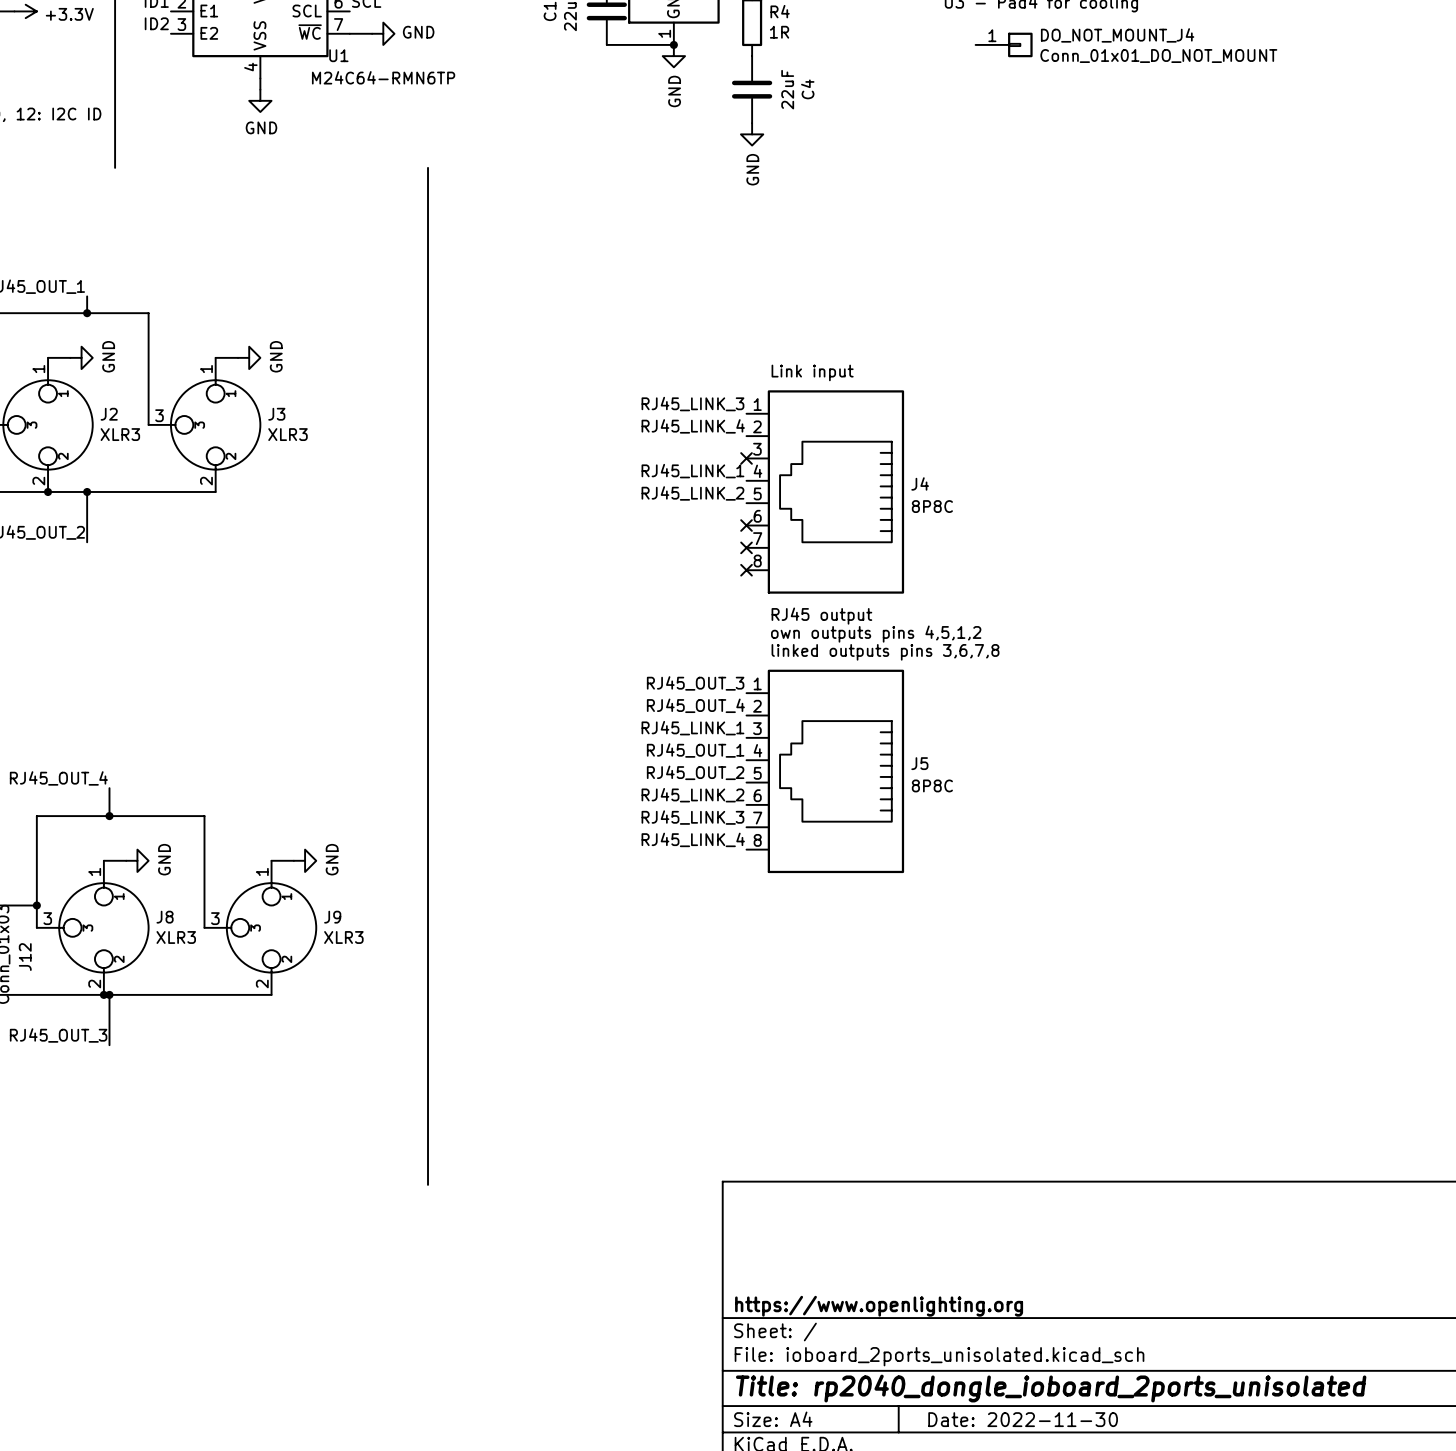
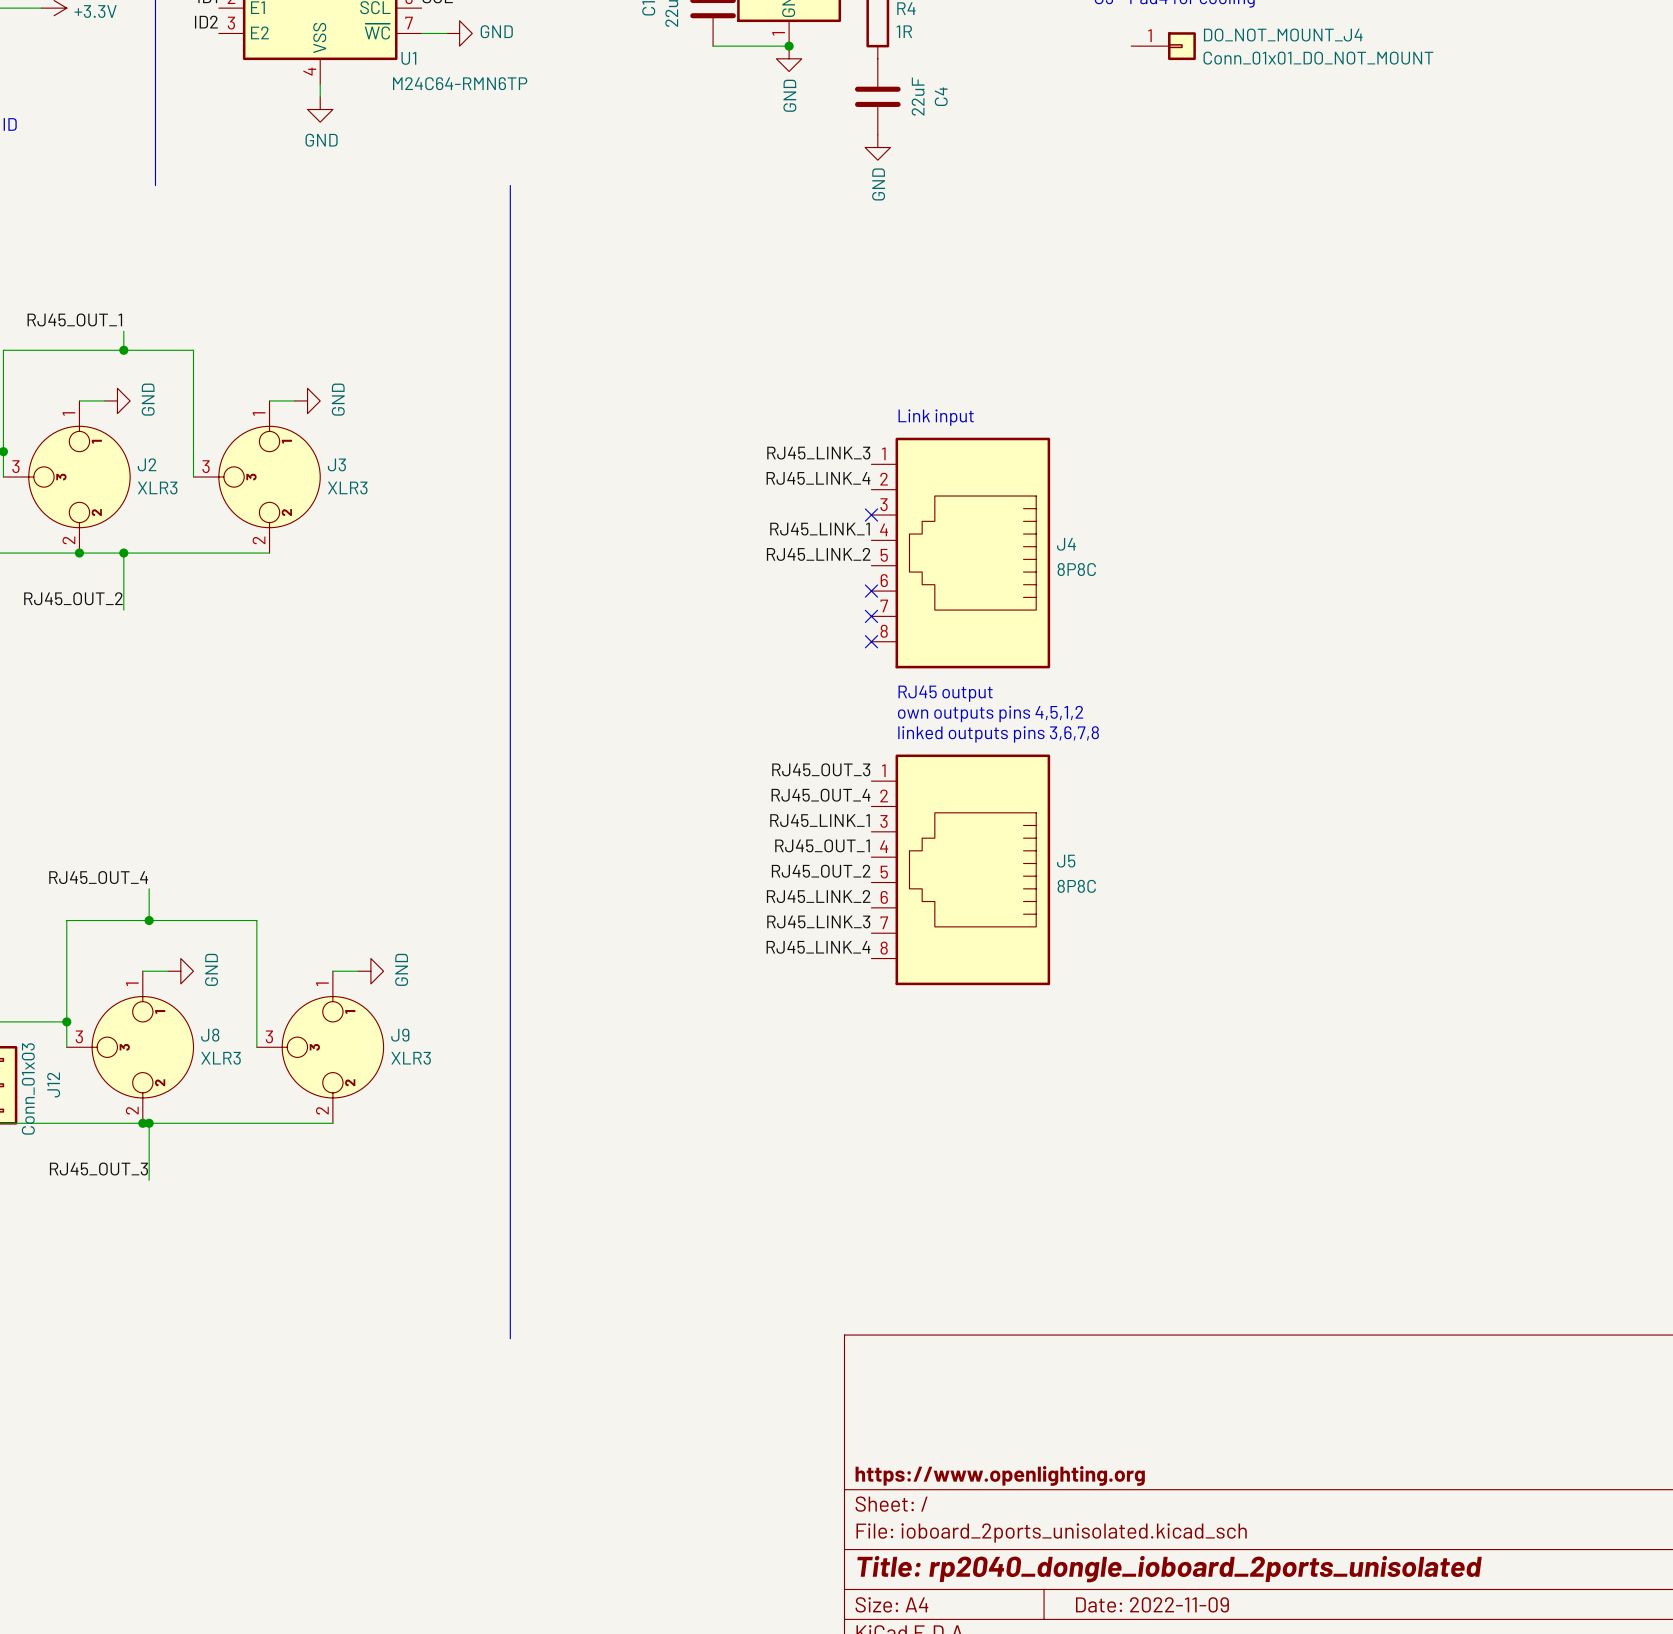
title block: Date: 2022-11-30 (1023, 1419) -> Date: 2022-11-09 (1152, 1604)

